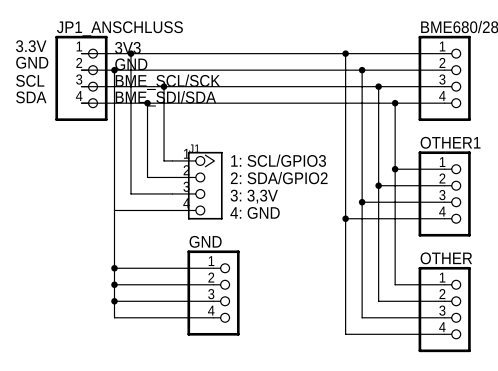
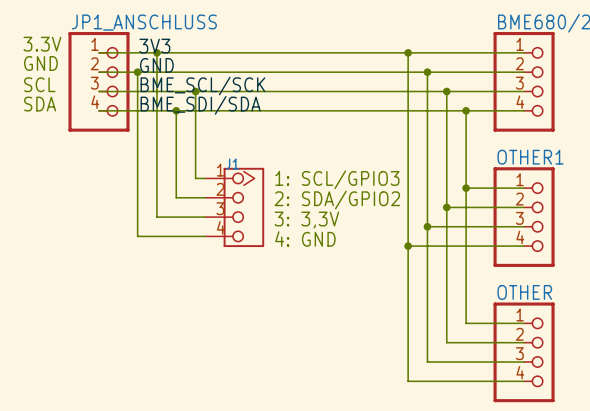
wire: (114, 210) (114, 317) (213, 317) -> none
wire: (114, 268) (213, 268) -> none
junction: (114, 268) -> none
wire: (114, 284) (213, 284) -> none
junction: (114, 284) -> none
GND: (213, 293) -> none
wire: (114, 301) (213, 301) -> none
junction: (114, 301) -> none

